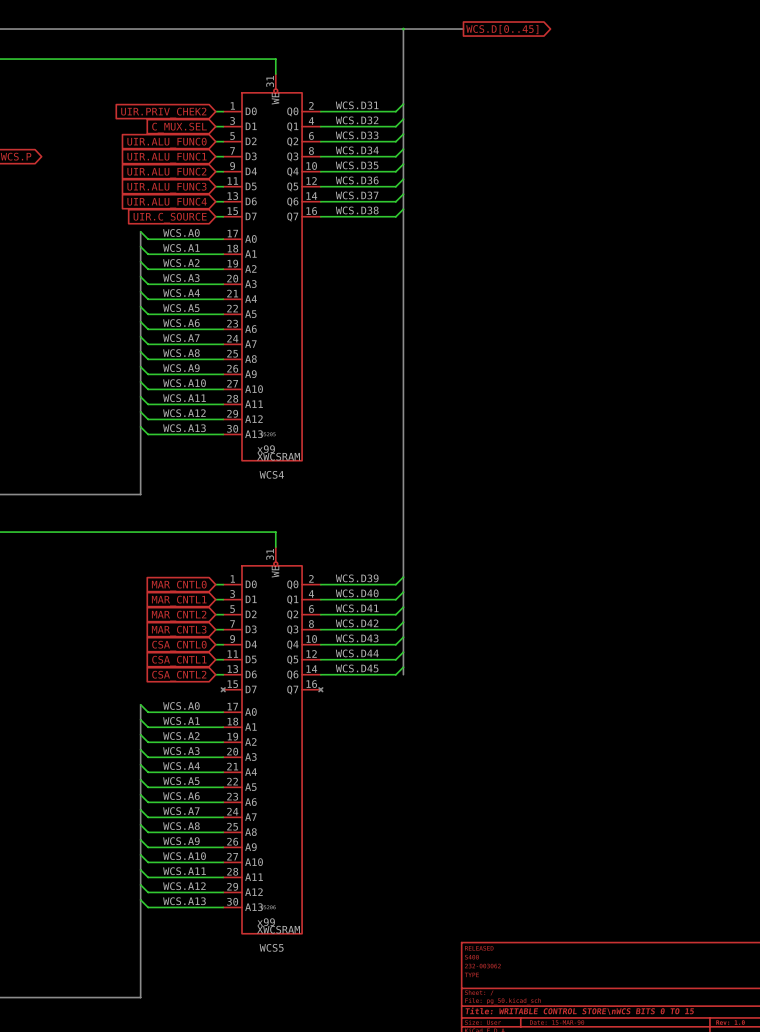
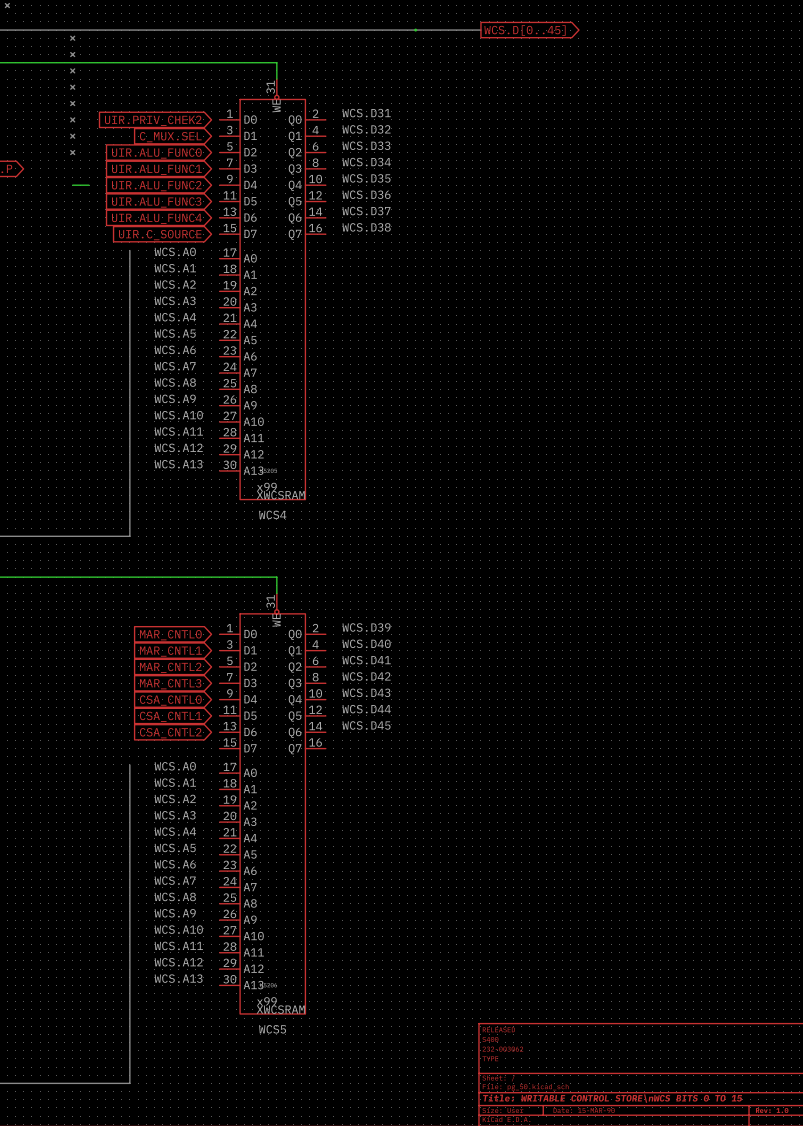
no-connect mark: none -> (7, 5)
bus: (403, 29) (403, 674) -> none
no-connect mark: none -> (72, 38)
no-connect mark: none -> (72, 54)
no-connect mark: none -> (72, 70)
no-connect mark: none -> (72, 87)
no-connect mark: none -> (72, 103)
wire: (403, 104) (395, 111) (320, 111) -> none
no-connect mark: none -> (72, 119)
wire: (215, 111) (223, 111) -> none
wire: (403, 119) (395, 126) (320, 126) -> none
no-connect mark: none -> (72, 136)
wire: (215, 126) (223, 126) -> none
wire: (403, 134) (395, 141) (320, 141) -> none
no-connect mark: none -> (72, 152)
wire: (215, 141) (223, 141) -> none
wire: (403, 149) (395, 156) (320, 156) -> none
wire: (215, 156) (223, 156) -> none
wire: (403, 164) (395, 171) (320, 171) -> none
wire: none -> (72, 185) (89, 185)
wire: (215, 171) (223, 171) -> none
wire: (403, 179) (395, 186) (320, 186) -> none
wire: (215, 186) (223, 186) -> none
wire: (403, 194) (395, 201) (320, 201) -> none
wire: (215, 201) (223, 201) -> none
wire: (403, 209) (395, 216) (320, 216) -> none
wire: (215, 216) (223, 216) -> none
wire: (140, 231) (148, 239) (223, 239) -> none
wire: (140, 246) (148, 254) (223, 254) -> none
wire: (140, 261) (148, 269) (223, 269) -> none
wire: (140, 276) (148, 284) (223, 284) -> none
wire: (140, 291) (148, 299) (223, 299) -> none
wire: (140, 306) (148, 314) (223, 314) -> none
wire: (140, 321) (148, 329) (223, 329) -> none
wire: (140, 336) (148, 344) (223, 344) -> none
wire: (140, 351) (148, 359) (223, 359) -> none
wire: (140, 366) (148, 374) (223, 374) -> none
wire: (140, 381) (148, 389) (223, 389) -> none
wire: (140, 396) (148, 404) (223, 404) -> none
wire: (140, 411) (148, 419) (223, 419) -> none
wire: (140, 426) (148, 434) (223, 434) -> none
wire: (403, 577) (395, 584) (320, 584) -> none
wire: (215, 584) (223, 584) -> none
wire: (403, 592) (395, 599) (320, 599) -> none
wire: (215, 599) (223, 599) -> none
wire: (403, 607) (395, 614) (320, 614) -> none
wire: (215, 614) (223, 614) -> none
wire: (403, 622) (395, 629) (320, 629) -> none
wire: (215, 629) (223, 629) -> none
wire: (403, 637) (395, 644) (320, 644) -> none
wire: (215, 644) (223, 644) -> none
wire: (403, 652) (395, 659) (320, 659) -> none
wire: (215, 659) (223, 659) -> none
wire: (403, 667) (395, 674) (320, 674) -> none
wire: (215, 674) (223, 674) -> none
no-connect mark: (223, 689) -> none
no-connect mark: (320, 689) -> none
wire: (140, 704) (148, 712) (223, 712) -> none
wire: (140, 719) (148, 727) (223, 727) -> none
wire: (140, 734) (148, 742) (223, 742) -> none
wire: (140, 749) (148, 757) (223, 757) -> none
wire: (140, 764) (148, 772) (223, 772) -> none
wire: (140, 779) (148, 787) (223, 787) -> none
wire: (140, 794) (148, 802) (223, 802) -> none
wire: (140, 809) (148, 817) (223, 817) -> none
wire: (140, 824) (148, 832) (223, 832) -> none
wire: (140, 839) (148, 847) (223, 847) -> none
wire: (140, 854) (148, 862) (223, 862) -> none
wire: (140, 869) (148, 877) (223, 877) -> none
wire: (140, 884) (148, 892) (223, 892) -> none
wire: (140, 899) (148, 907) (223, 907) -> none

